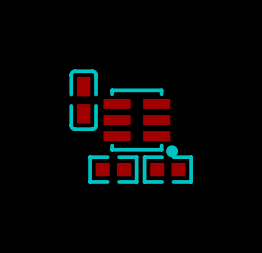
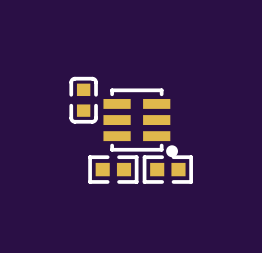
part footprint: [69, 69, 98, 132] -> [69, 76, 98, 124]

